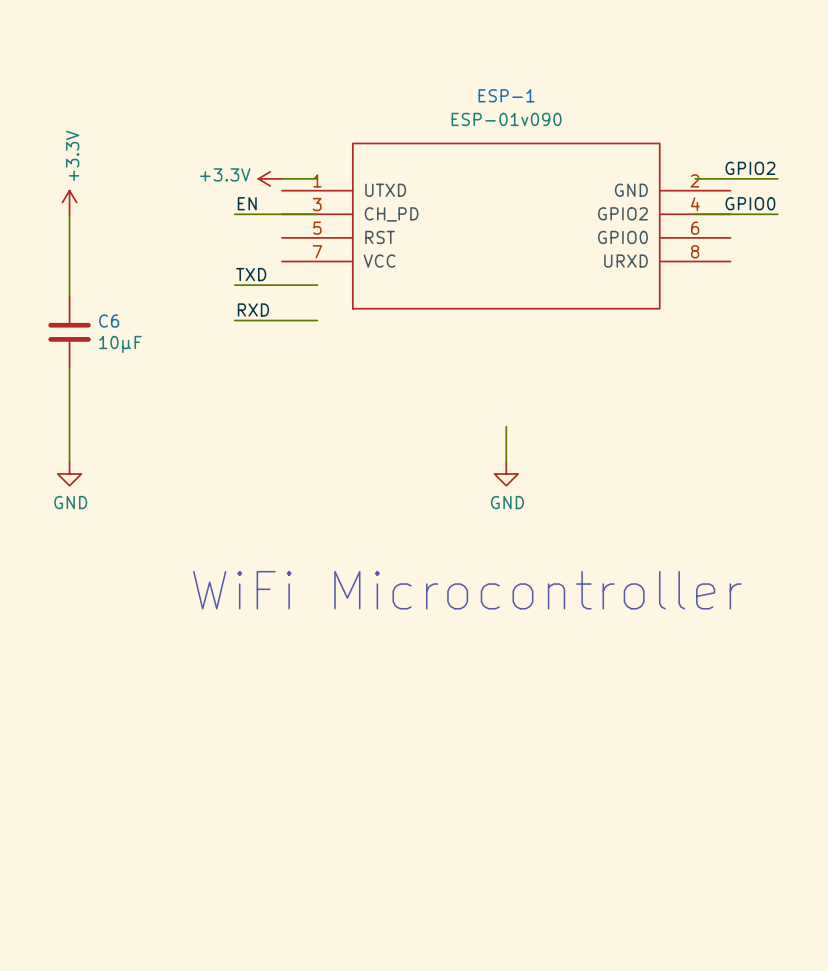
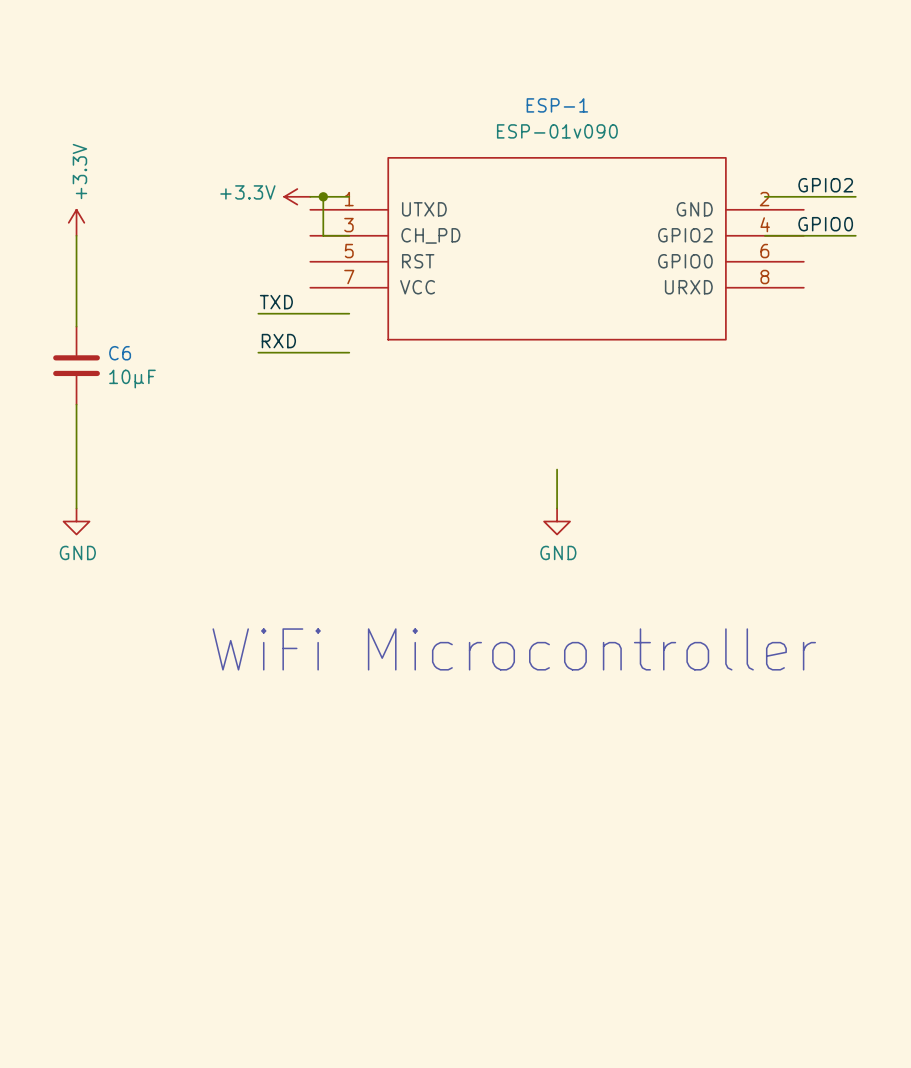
junction: none -> (323, 196)
label: EN (247, 203) -> none
wire: (234, 214) (293, 214) -> (323, 196) (323, 235)

